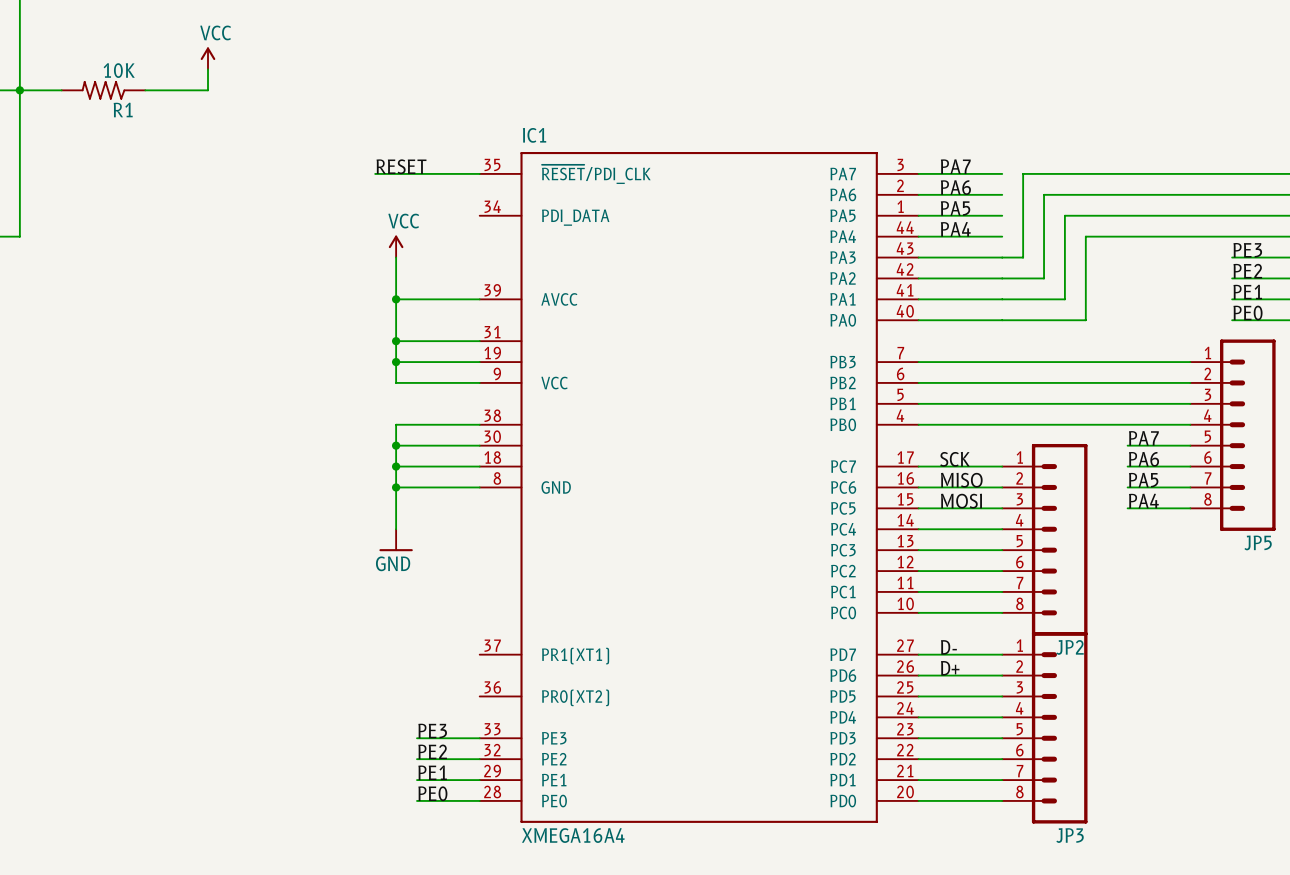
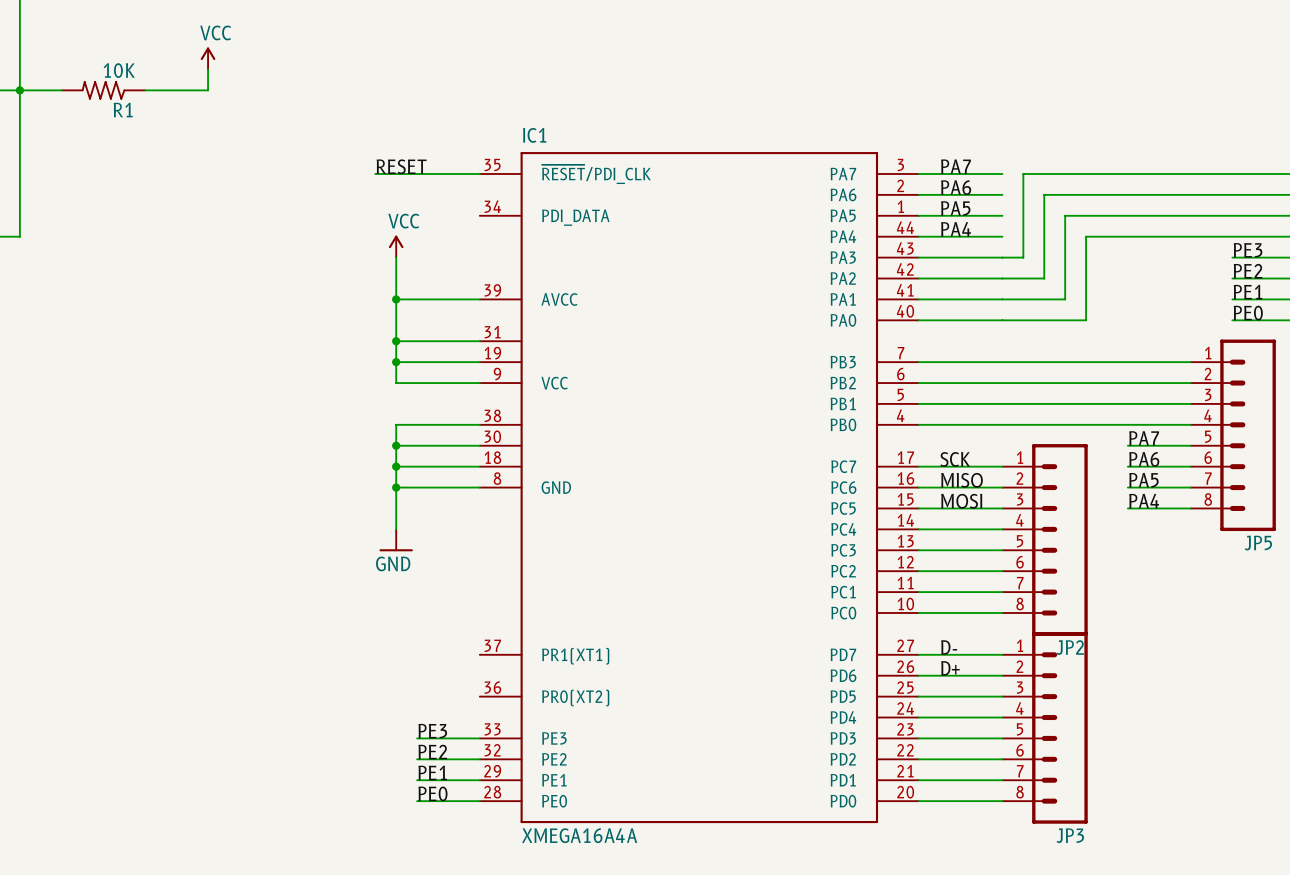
IC1 value: XMEGA16A4 (573, 835) -> XMEGA16A4A (579, 835)

